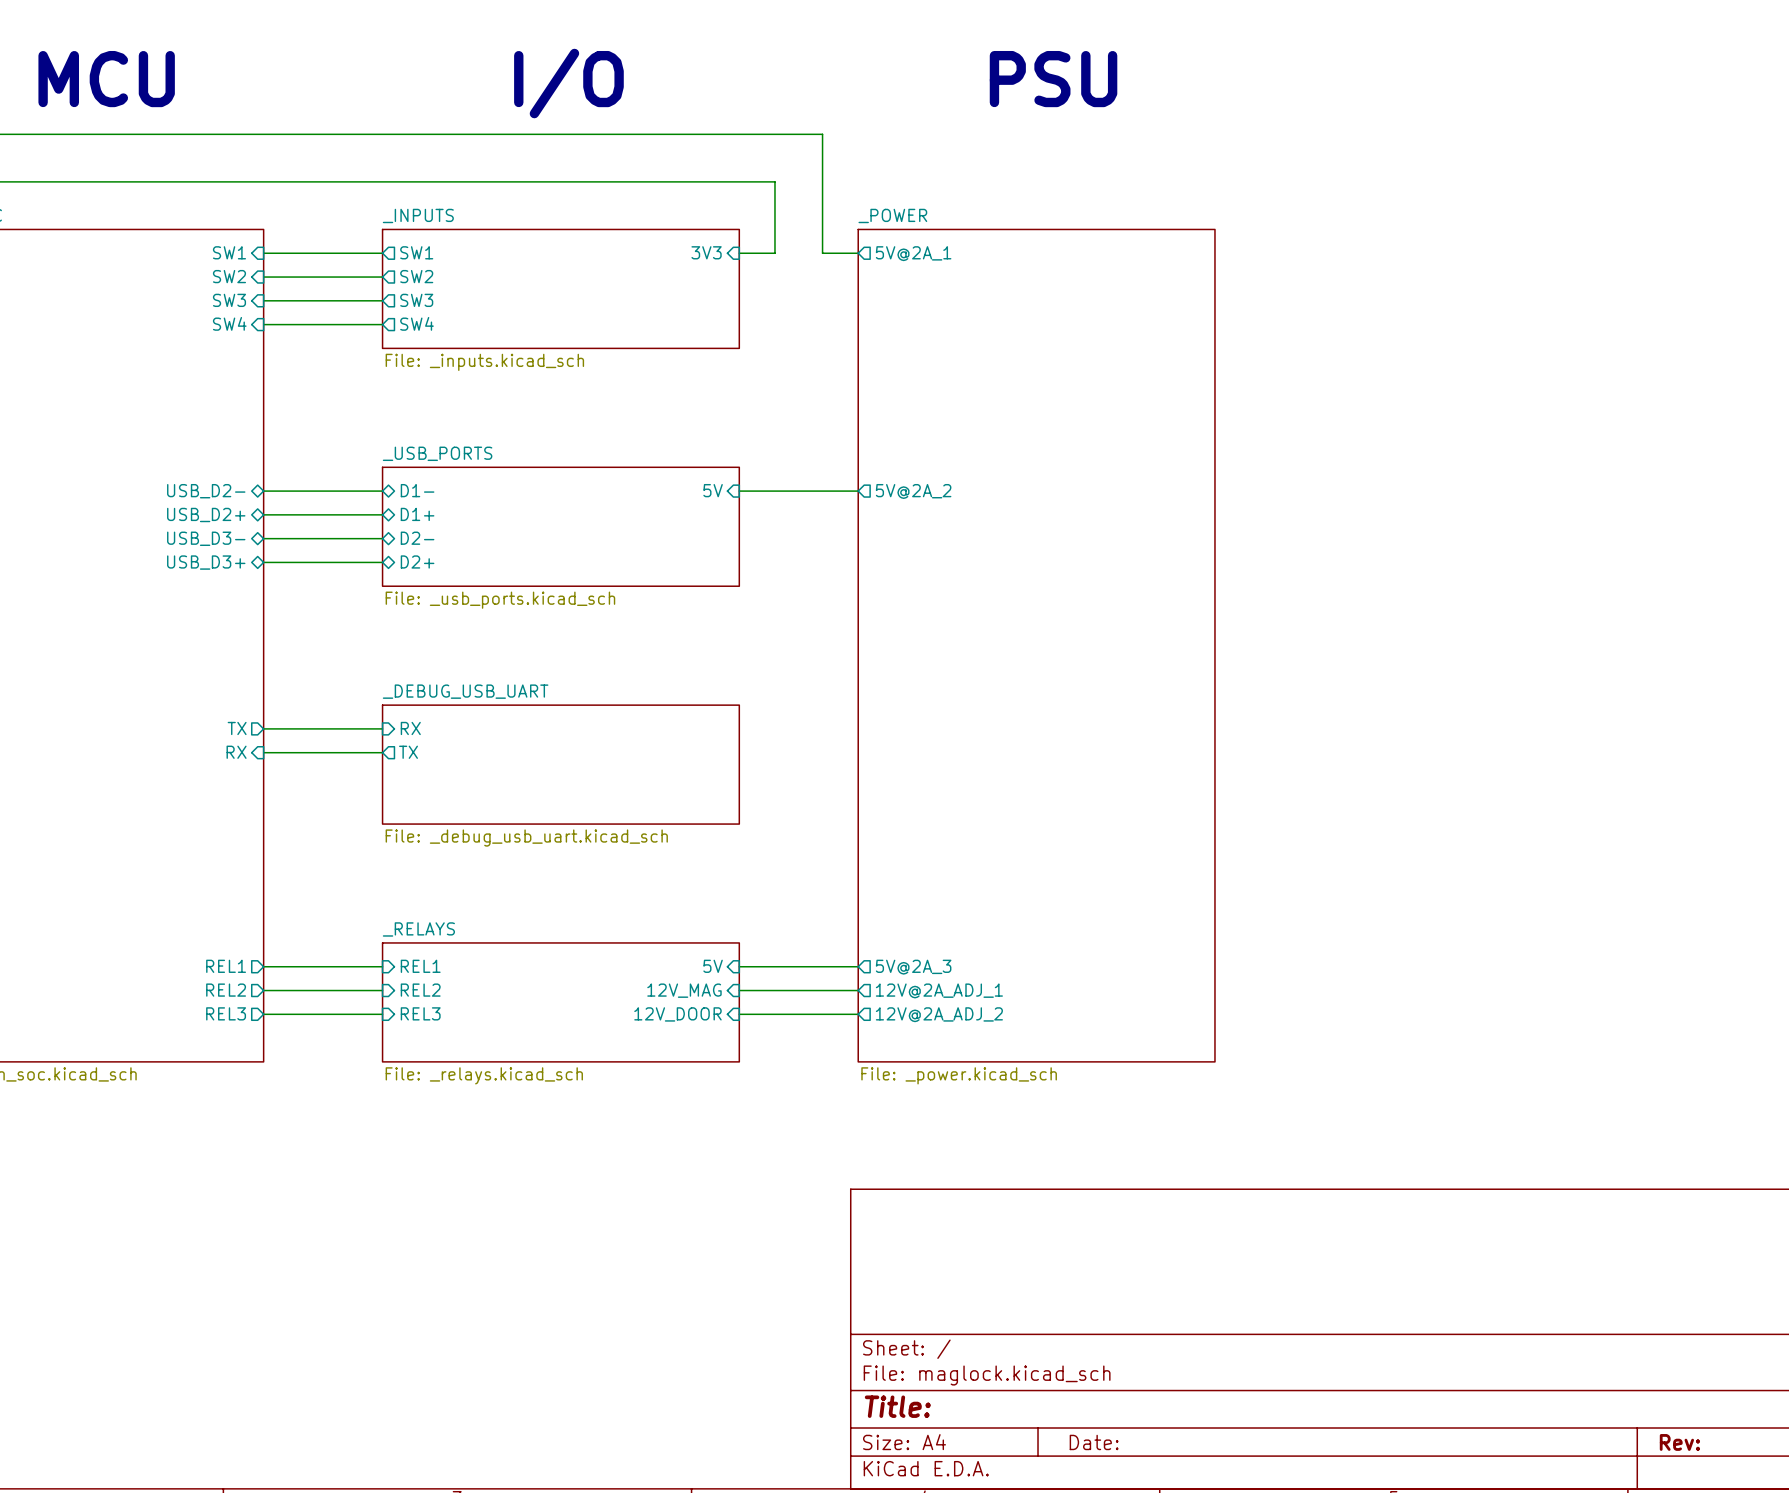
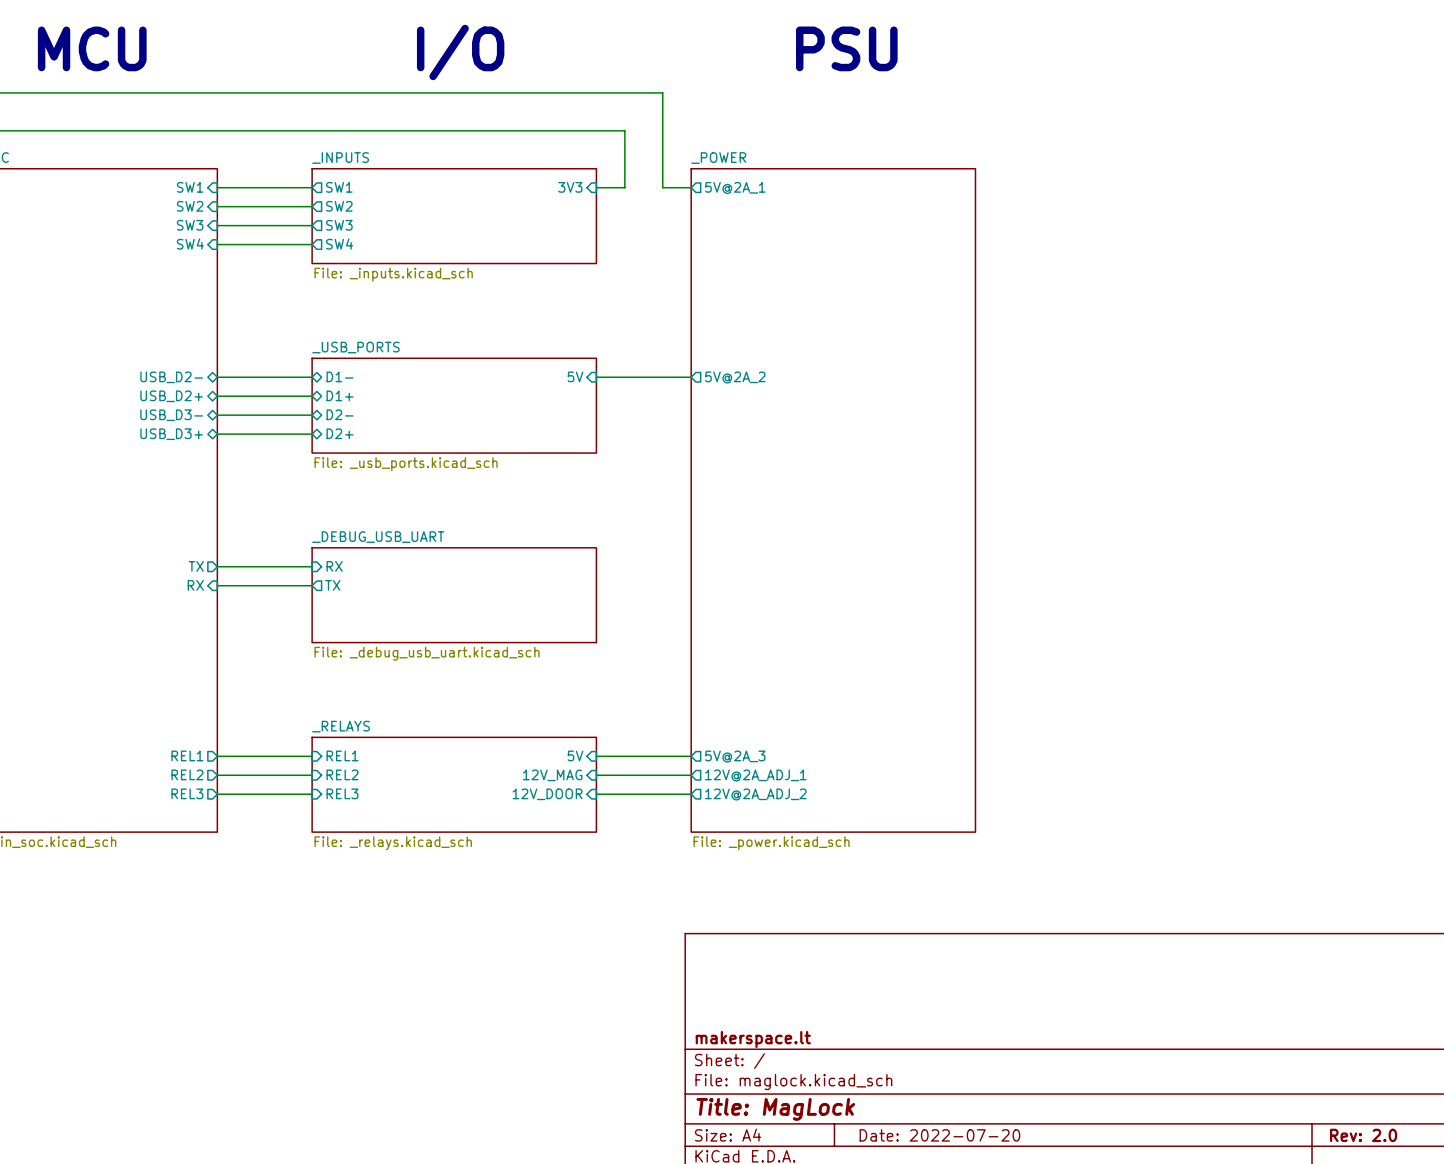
title block: none -> makerspace.lt (753, 1039)
title block: Title: (897, 1406) -> Title: MagLock (775, 1109)
title block: Date: (1094, 1442) -> Date: 2022-07-20 (939, 1135)
title block: Rev: (1679, 1442) -> Rev: 2.0 (1363, 1135)

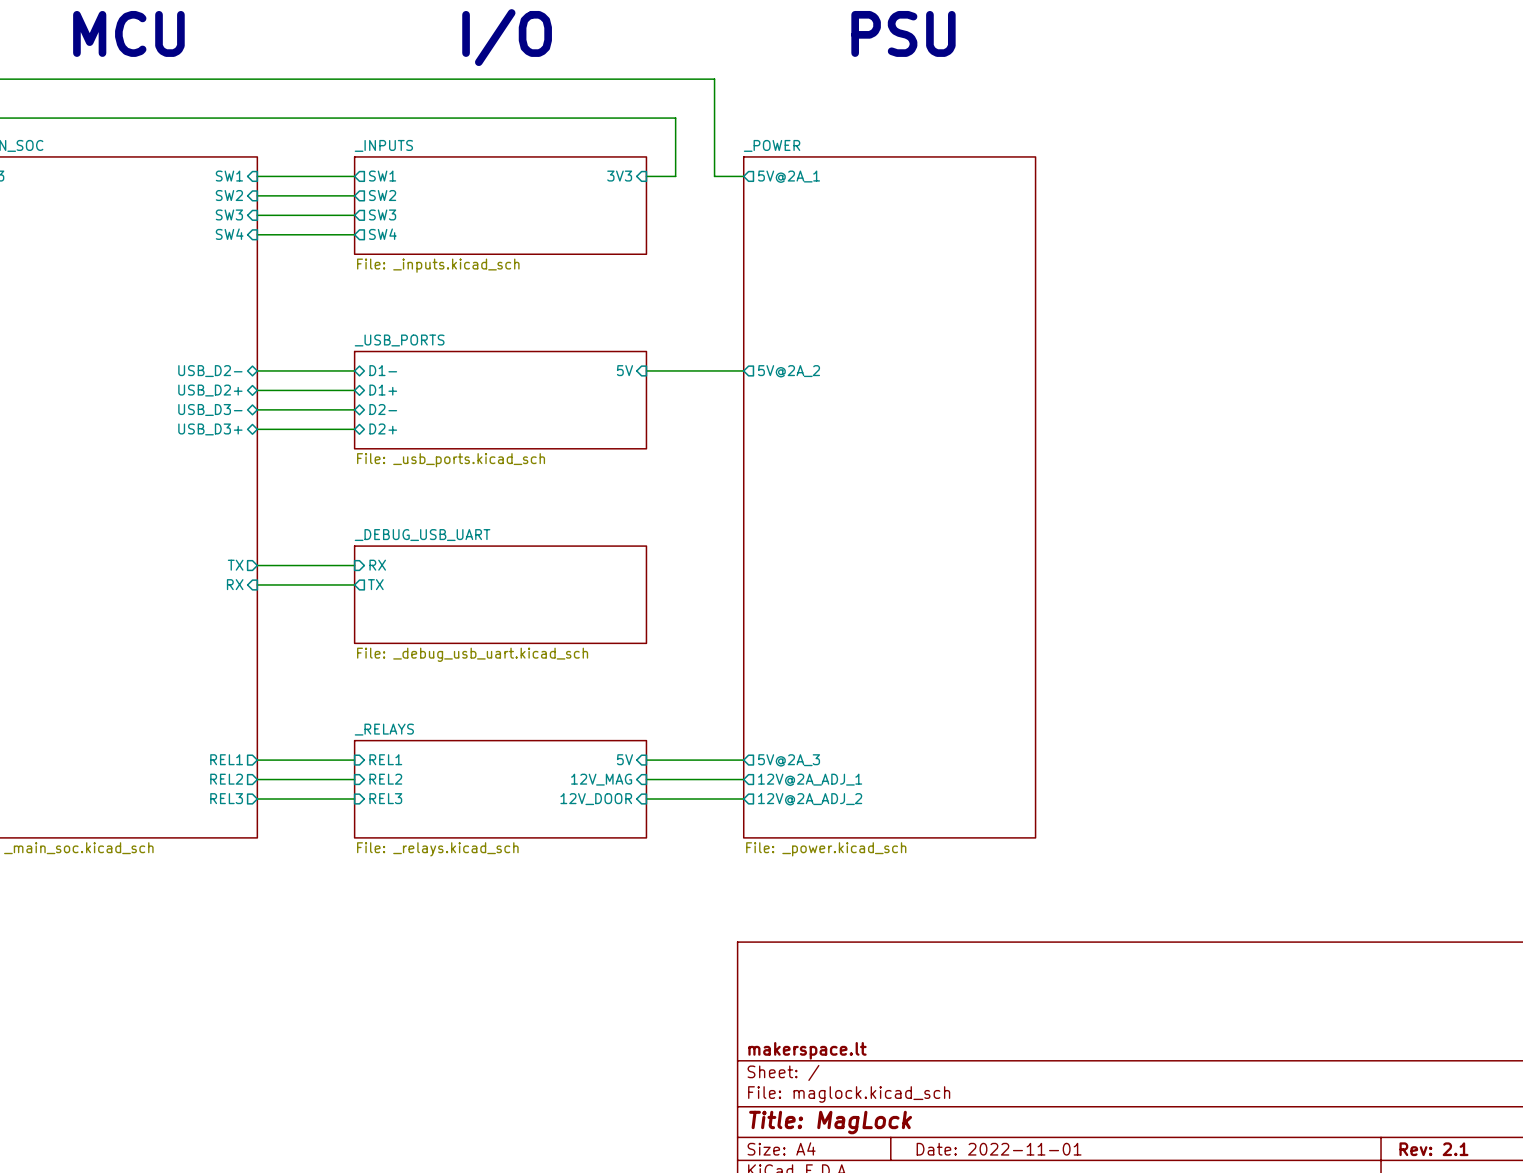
title block: Date: 2022-07-20 (939, 1135) -> Date: 2022-11-01 (999, 1149)
title block: Rev: 2.0 (1363, 1135) -> Rev: 2.1 (1433, 1149)

